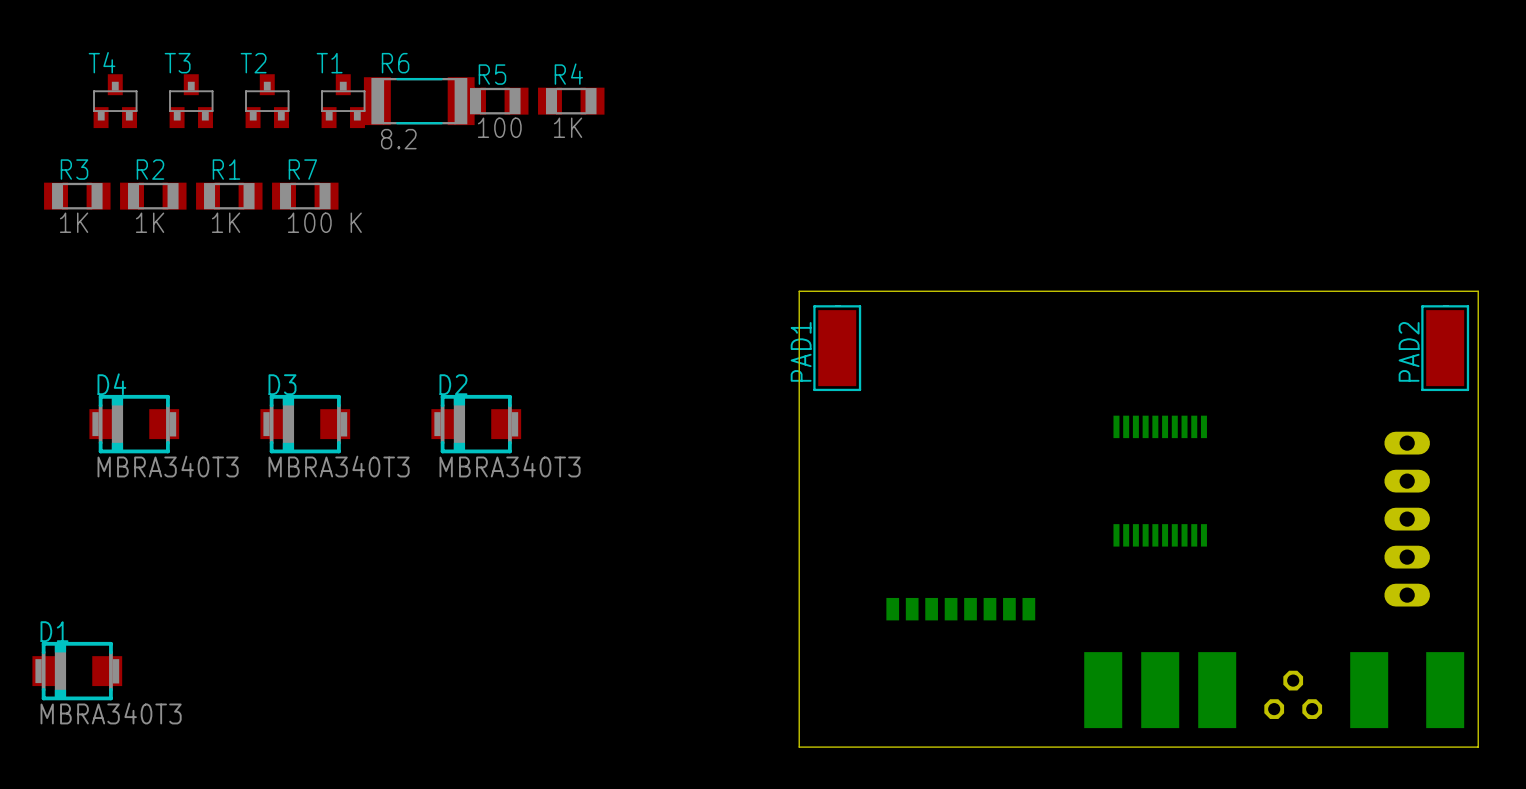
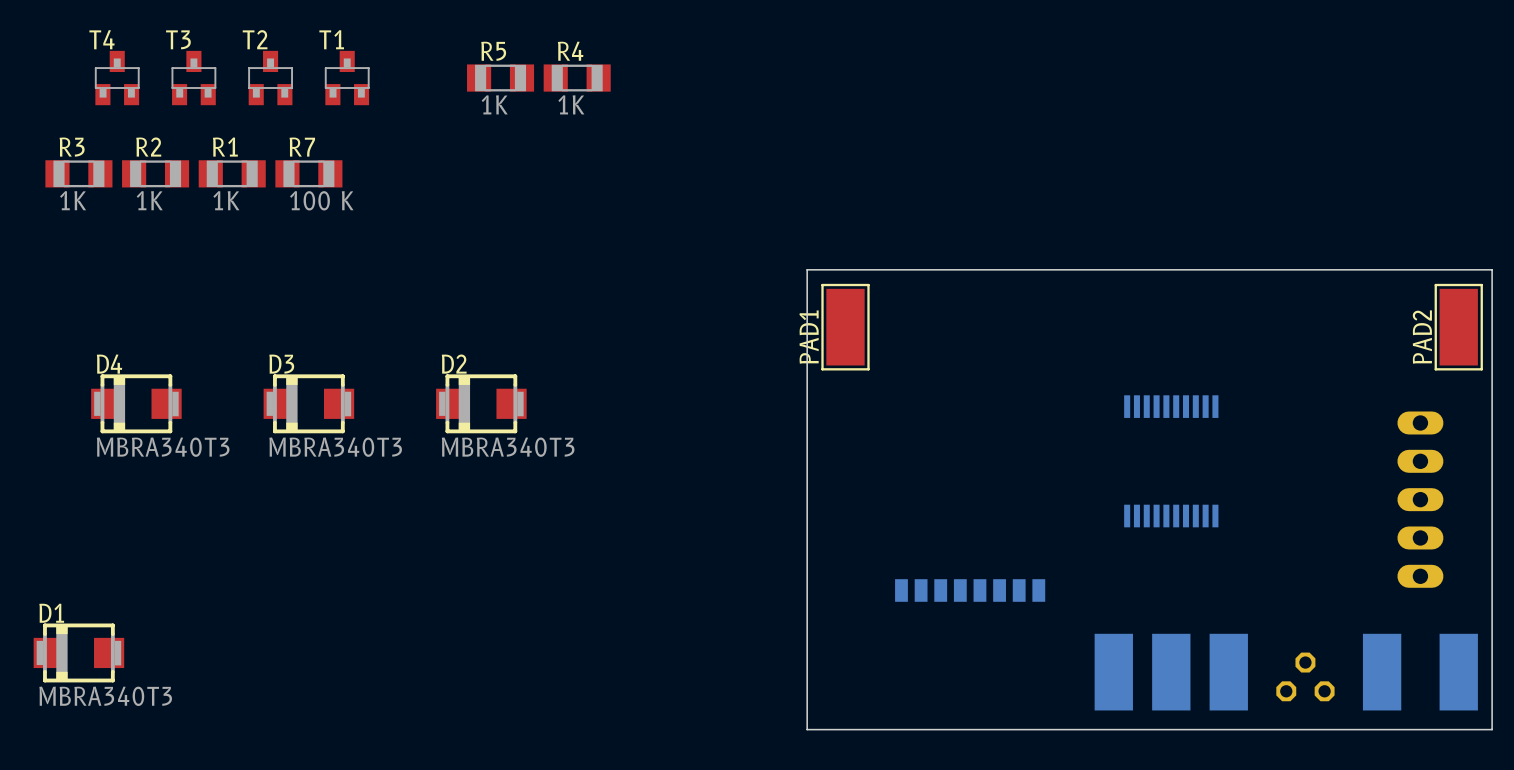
R6: 8.2 (419, 101) -> none
R5 value: 100 (499, 127) -> 1K (494, 104)

